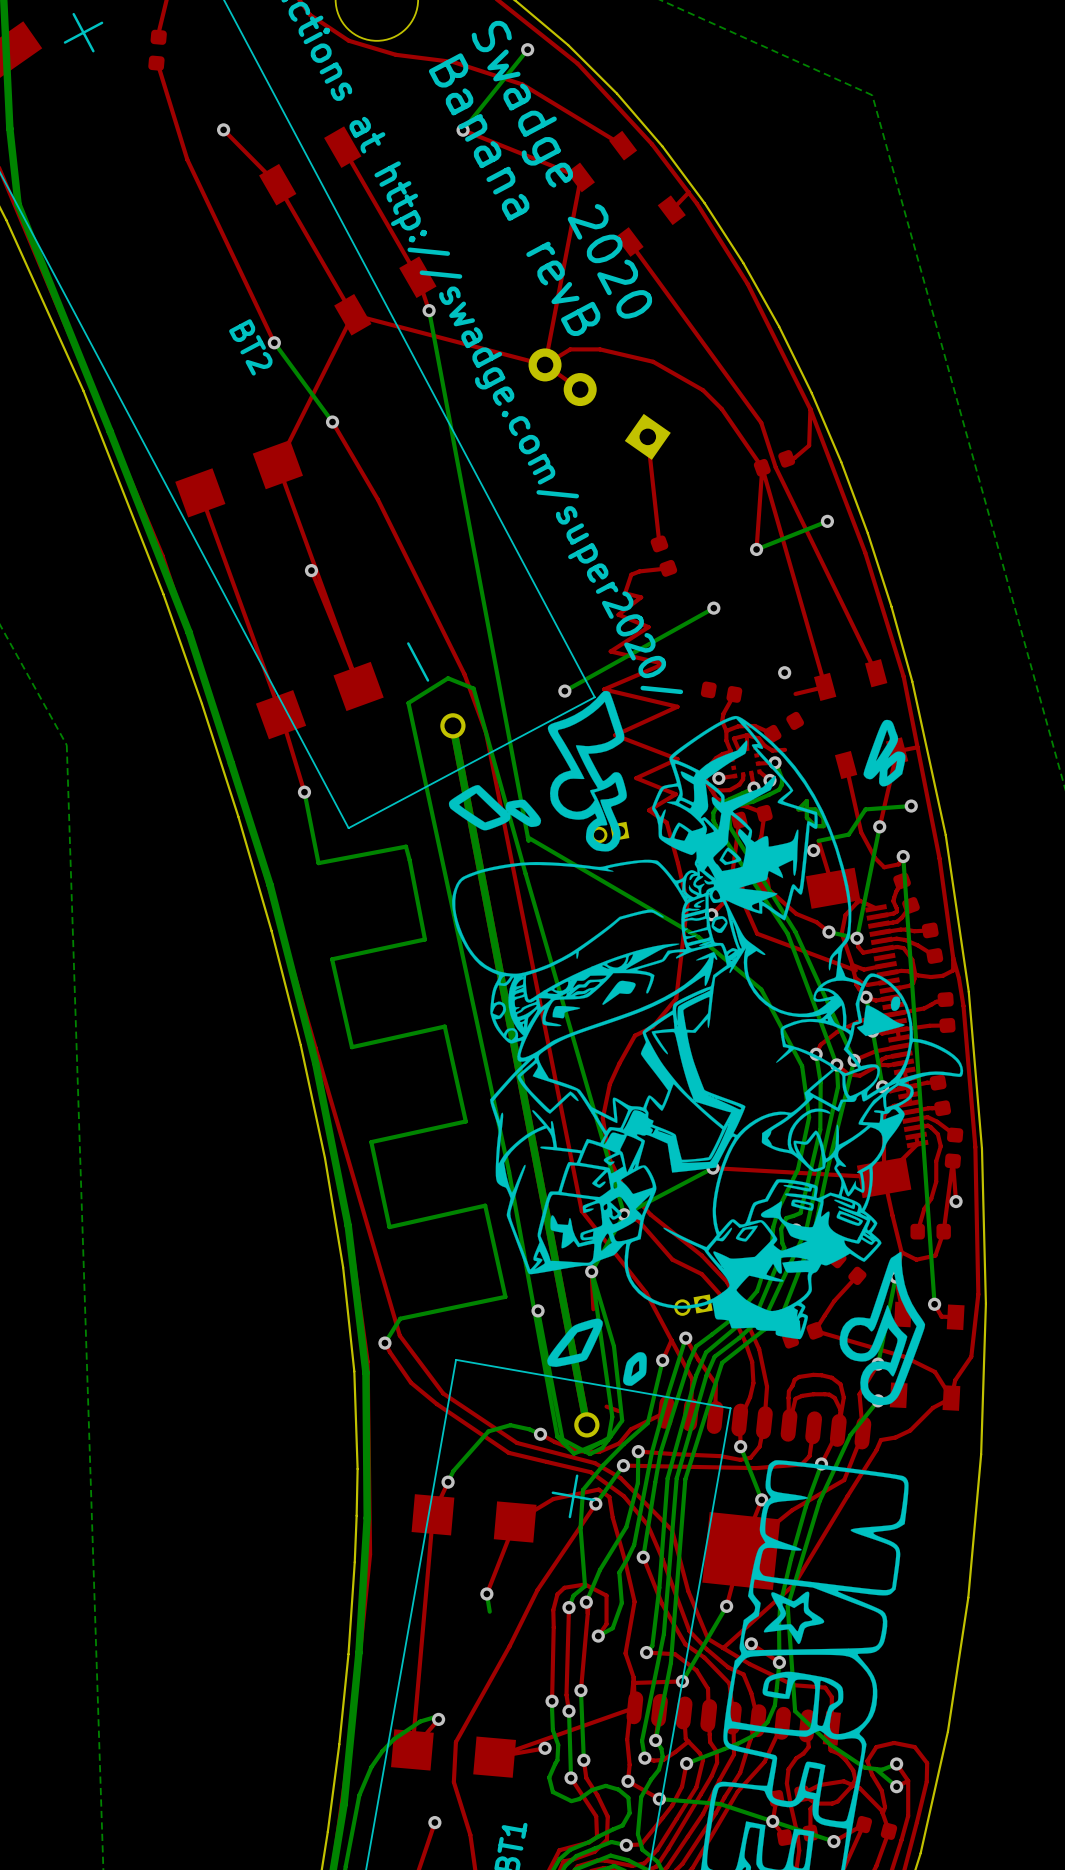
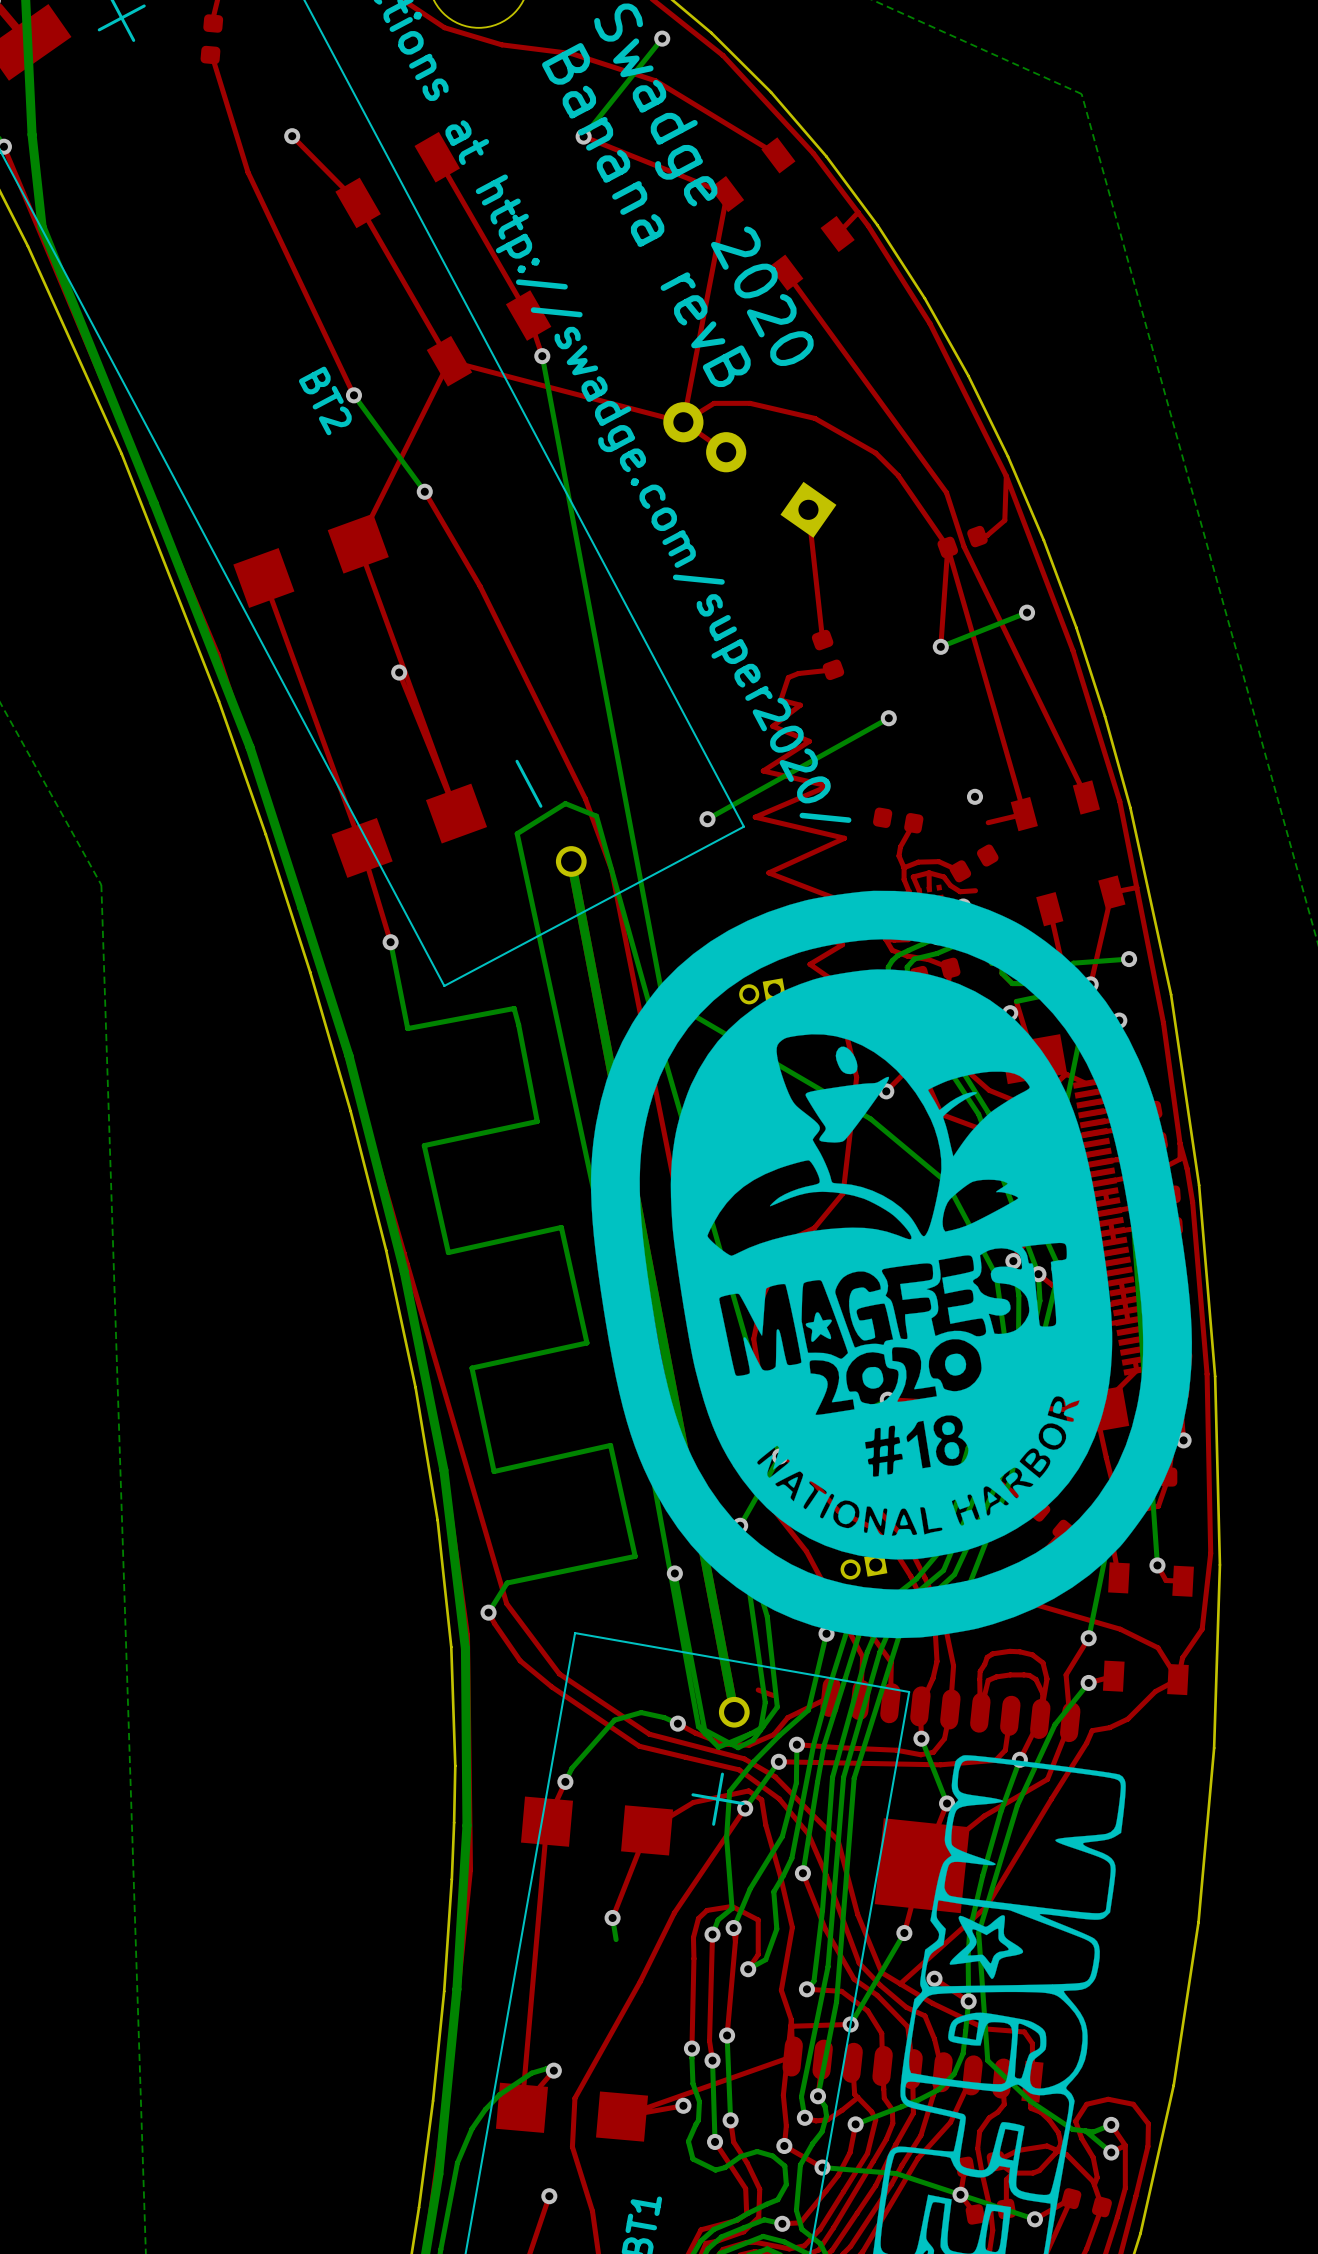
drawing shape: [448, 690, 964, 1406] -> [590, 890, 1192, 1639]

